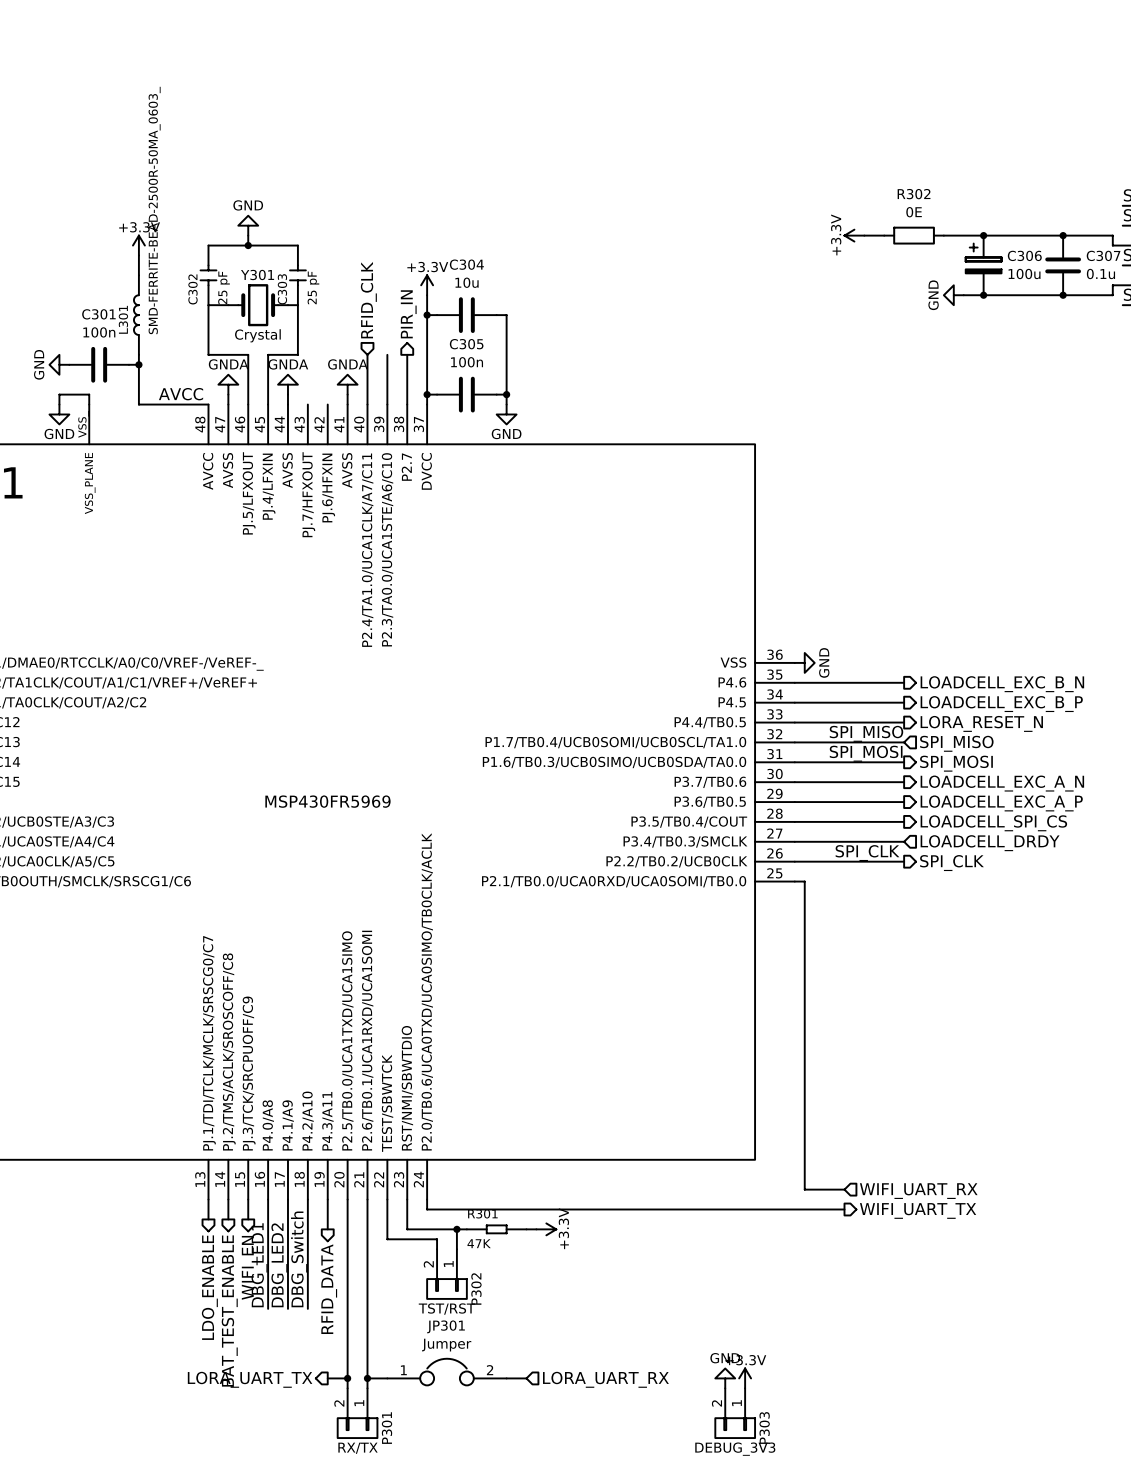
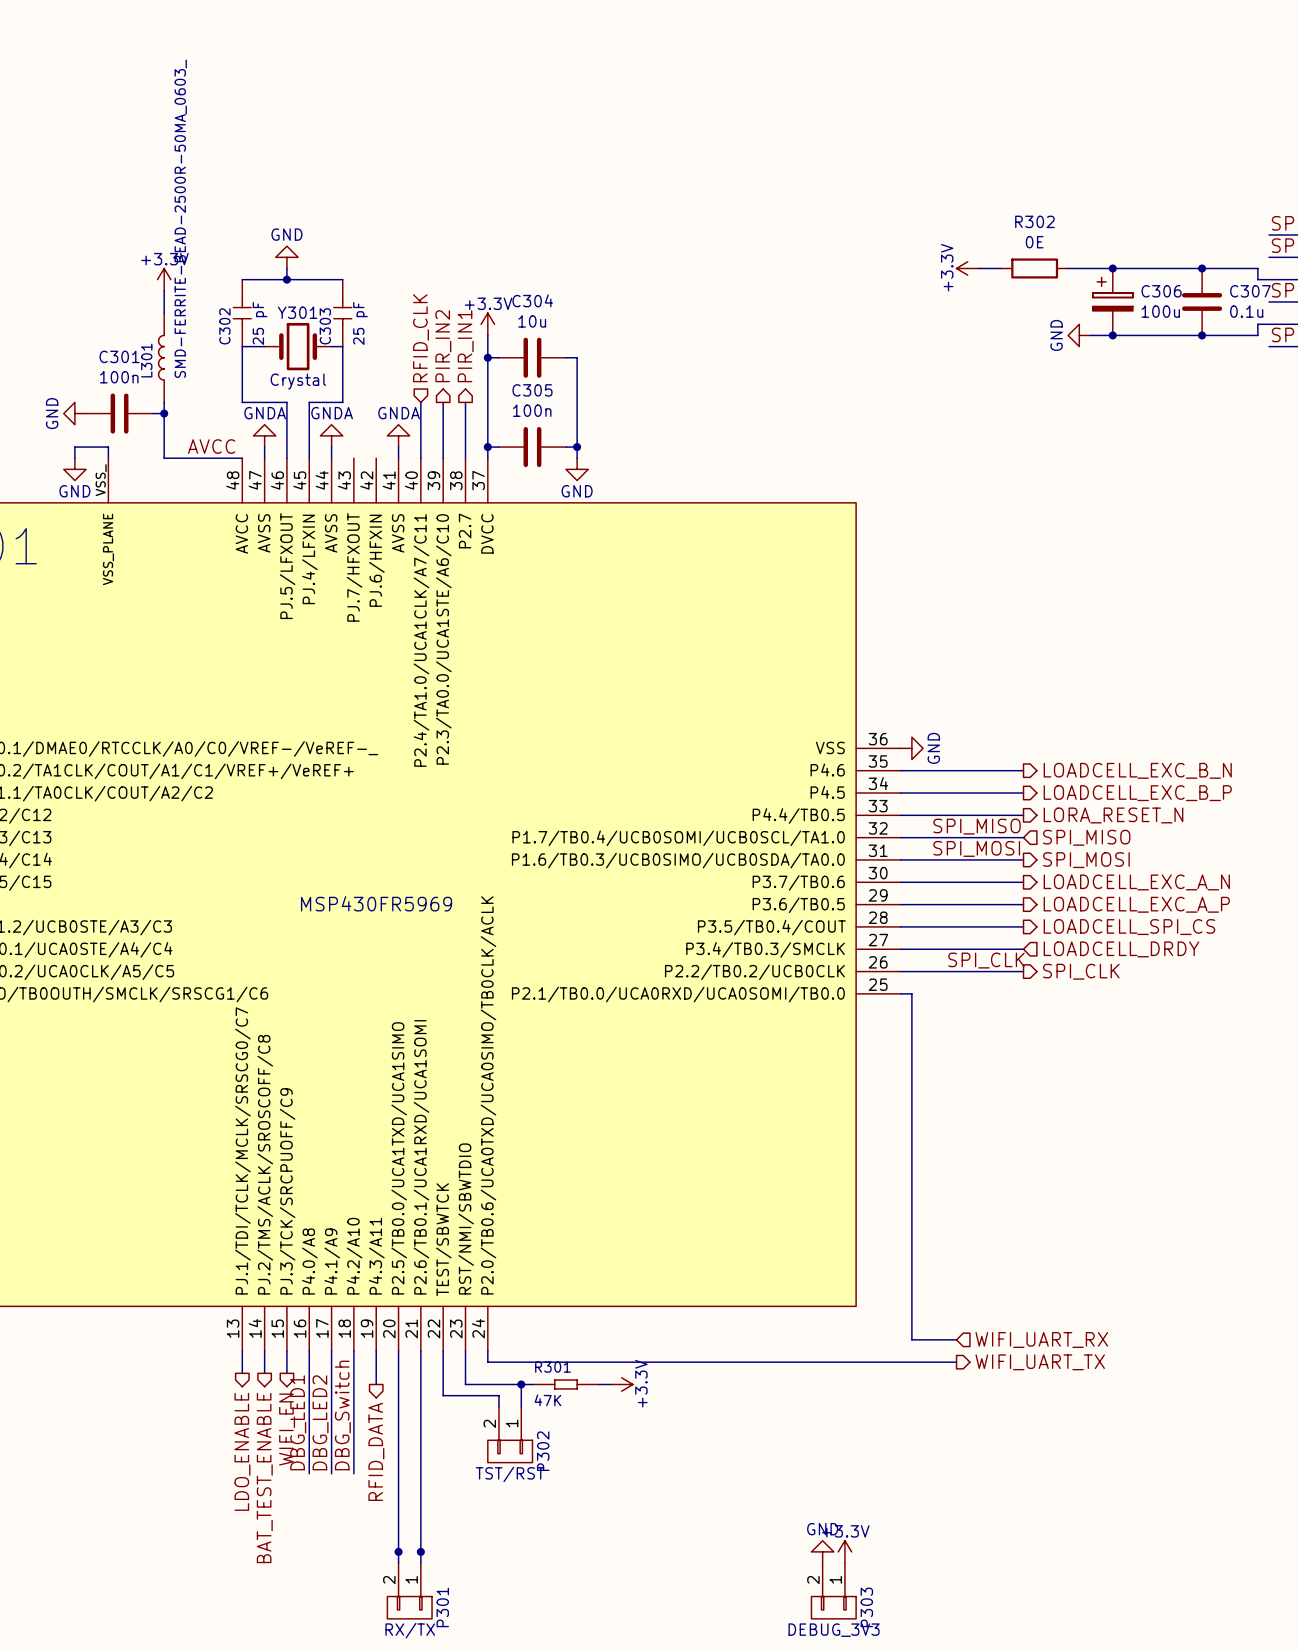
hierarchical label: none -> PIR_IN2 (443, 346)
hierarchical label: PIR_IN (408, 314) -> PIR_IN1 (465, 346)
JP301: Jumper (446, 1372) -> none
wire: (327, 1378) (347, 1378) -> none
wire: (367, 1378) (387, 1378) -> none
wire: (506, 1378) (526, 1378) -> none
hierarchical label: LORA_UART_TX (250, 1379) -> none
hierarchical label: LORA_UART_RX (605, 1379) -> none

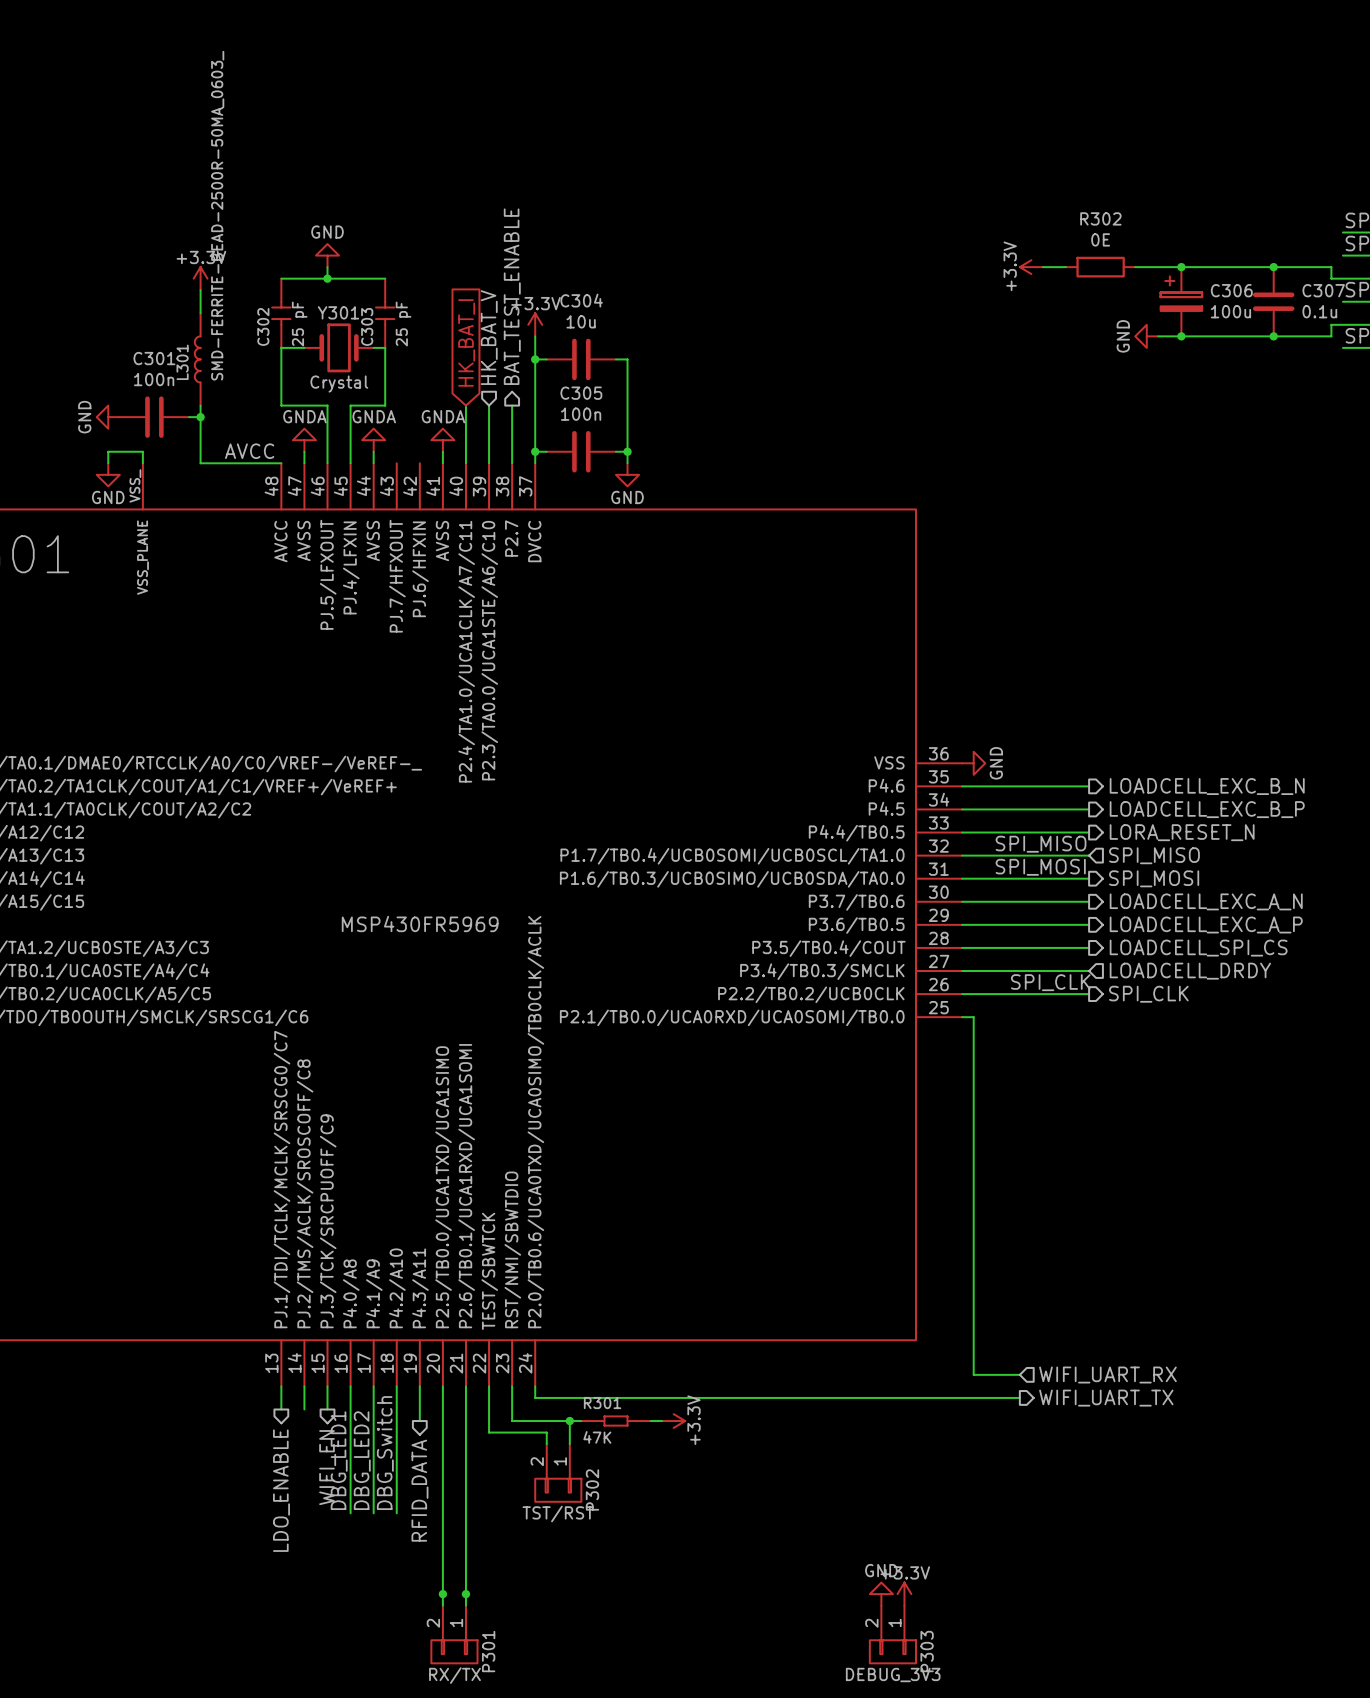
hierarchical label: RFID_CLK (421, 338) -> none
global label: none -> HK_BAT_I (466, 342)
hierarchical label shape: output (443, 346) -> input (489, 337)
hierarchical label: PIR_IN2 (443, 346) -> HK_BAT_V (489, 337)
hierarchical label: PIR_IN1 (465, 346) -> BAT_TEST_ENABLE (512, 296)
hierarchical label: BAT_TEST_ENABLE (264, 1478) -> none

